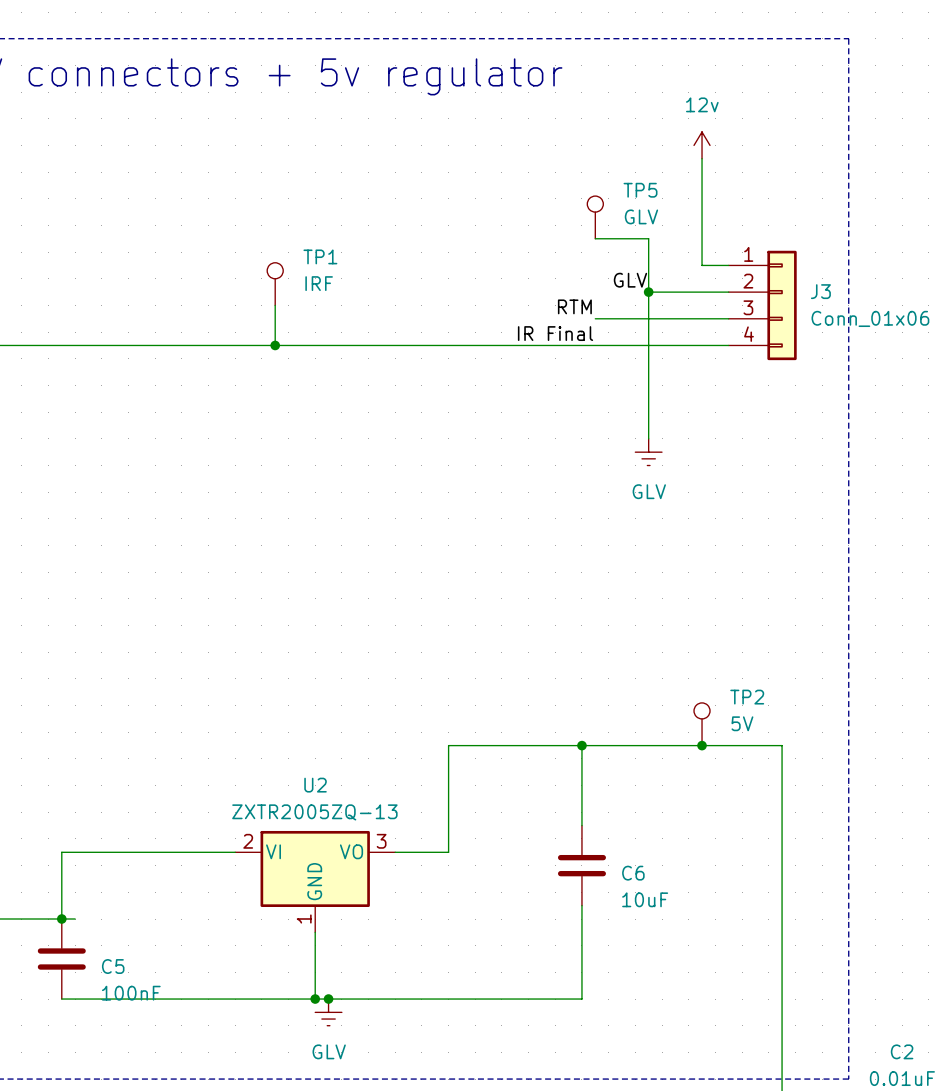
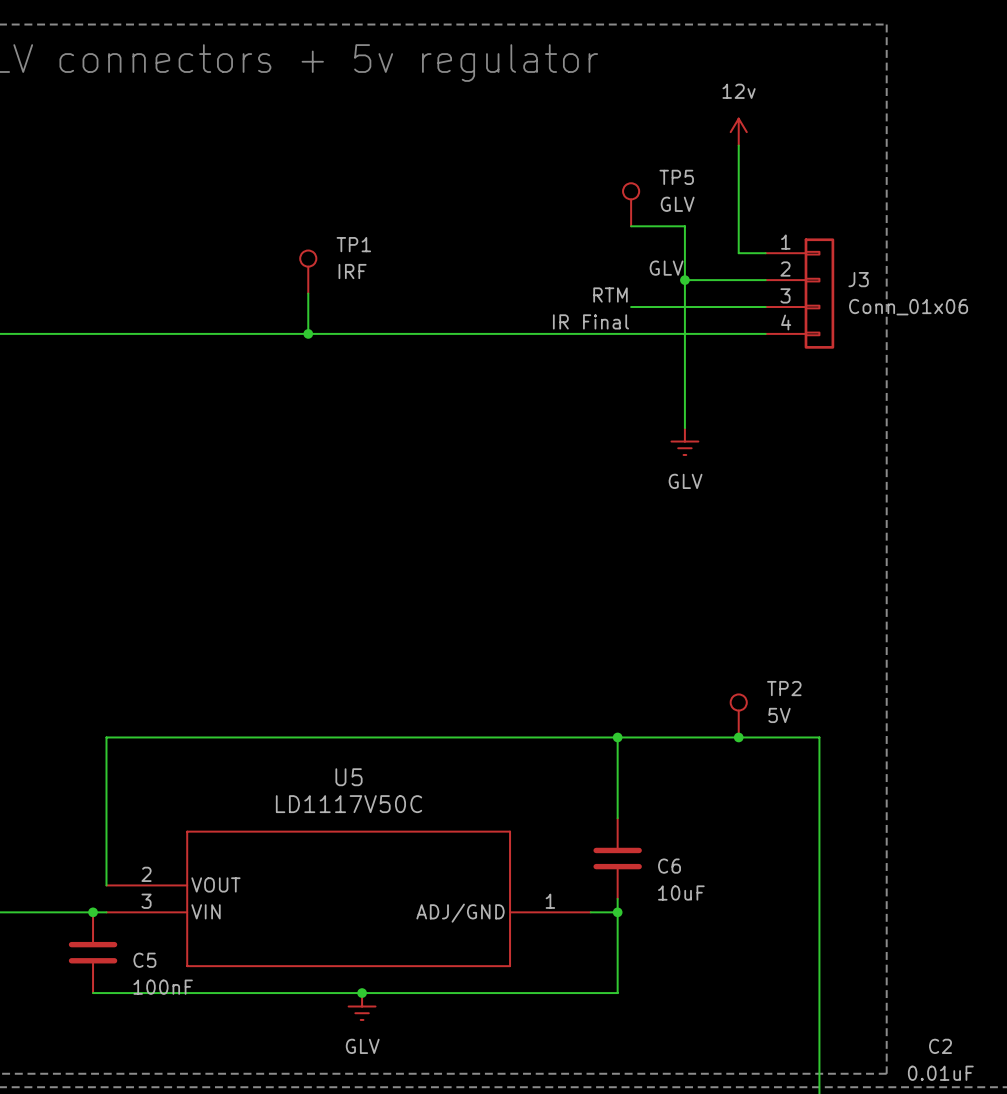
wire: (448, 745) (448, 852) (395, 852) -> (483, 737) (106, 737) (106, 885)
wire: (235, 852) (61, 852) (61, 919) -> none
U2: ZXTR2005ZQ-13 (315, 881) -> none
U5: none -> LD1117V50C (348, 898)
wire: none -> (590, 912) (617, 912)
junction: none -> (617, 912)
wire: (315, 932) (315, 999) -> none
junction: (315, 999) -> none

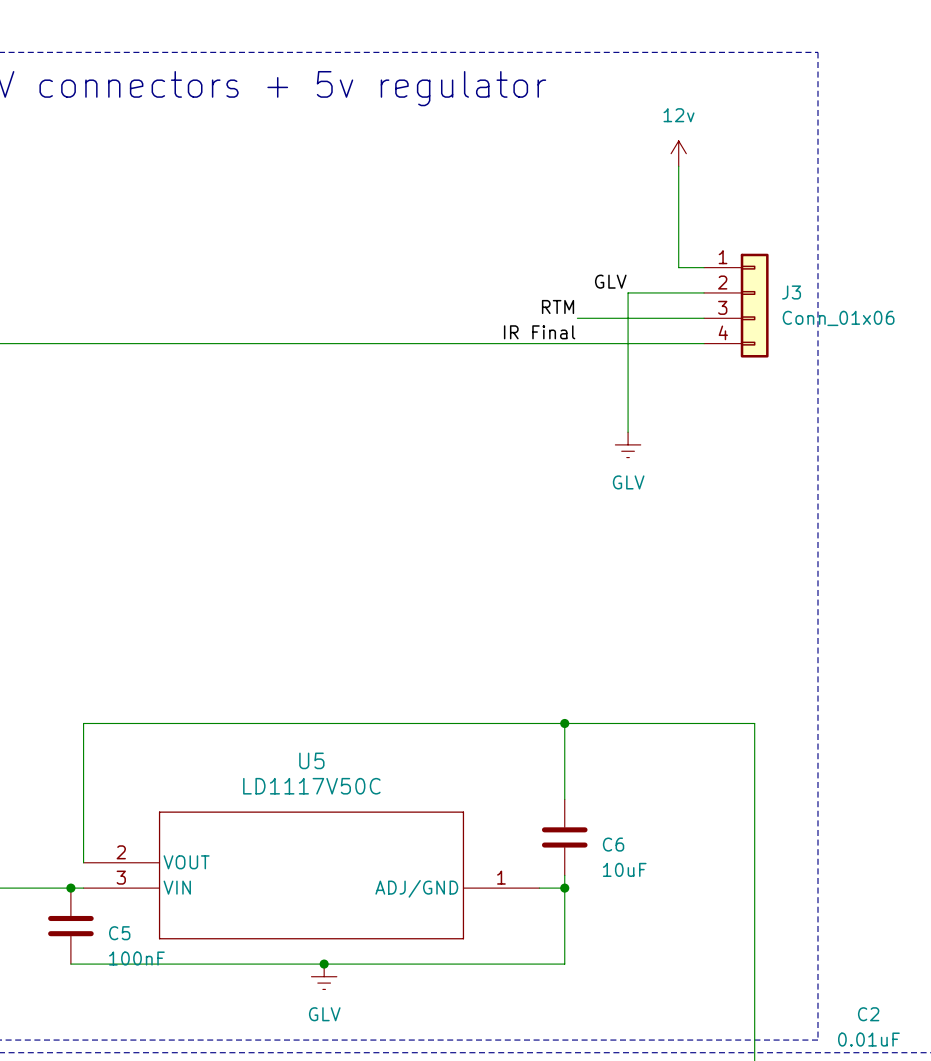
TP5: GLV (631, 204) -> none
wire: (631, 226) (684, 226) (684, 280) -> none
TP1: IRF (308, 272) -> none
junction: (684, 280) -> none
wire: (308, 293) (308, 333) -> none
junction: (308, 333) -> none
TP2: 5V (738, 715) -> none
junction: (738, 737) -> none

